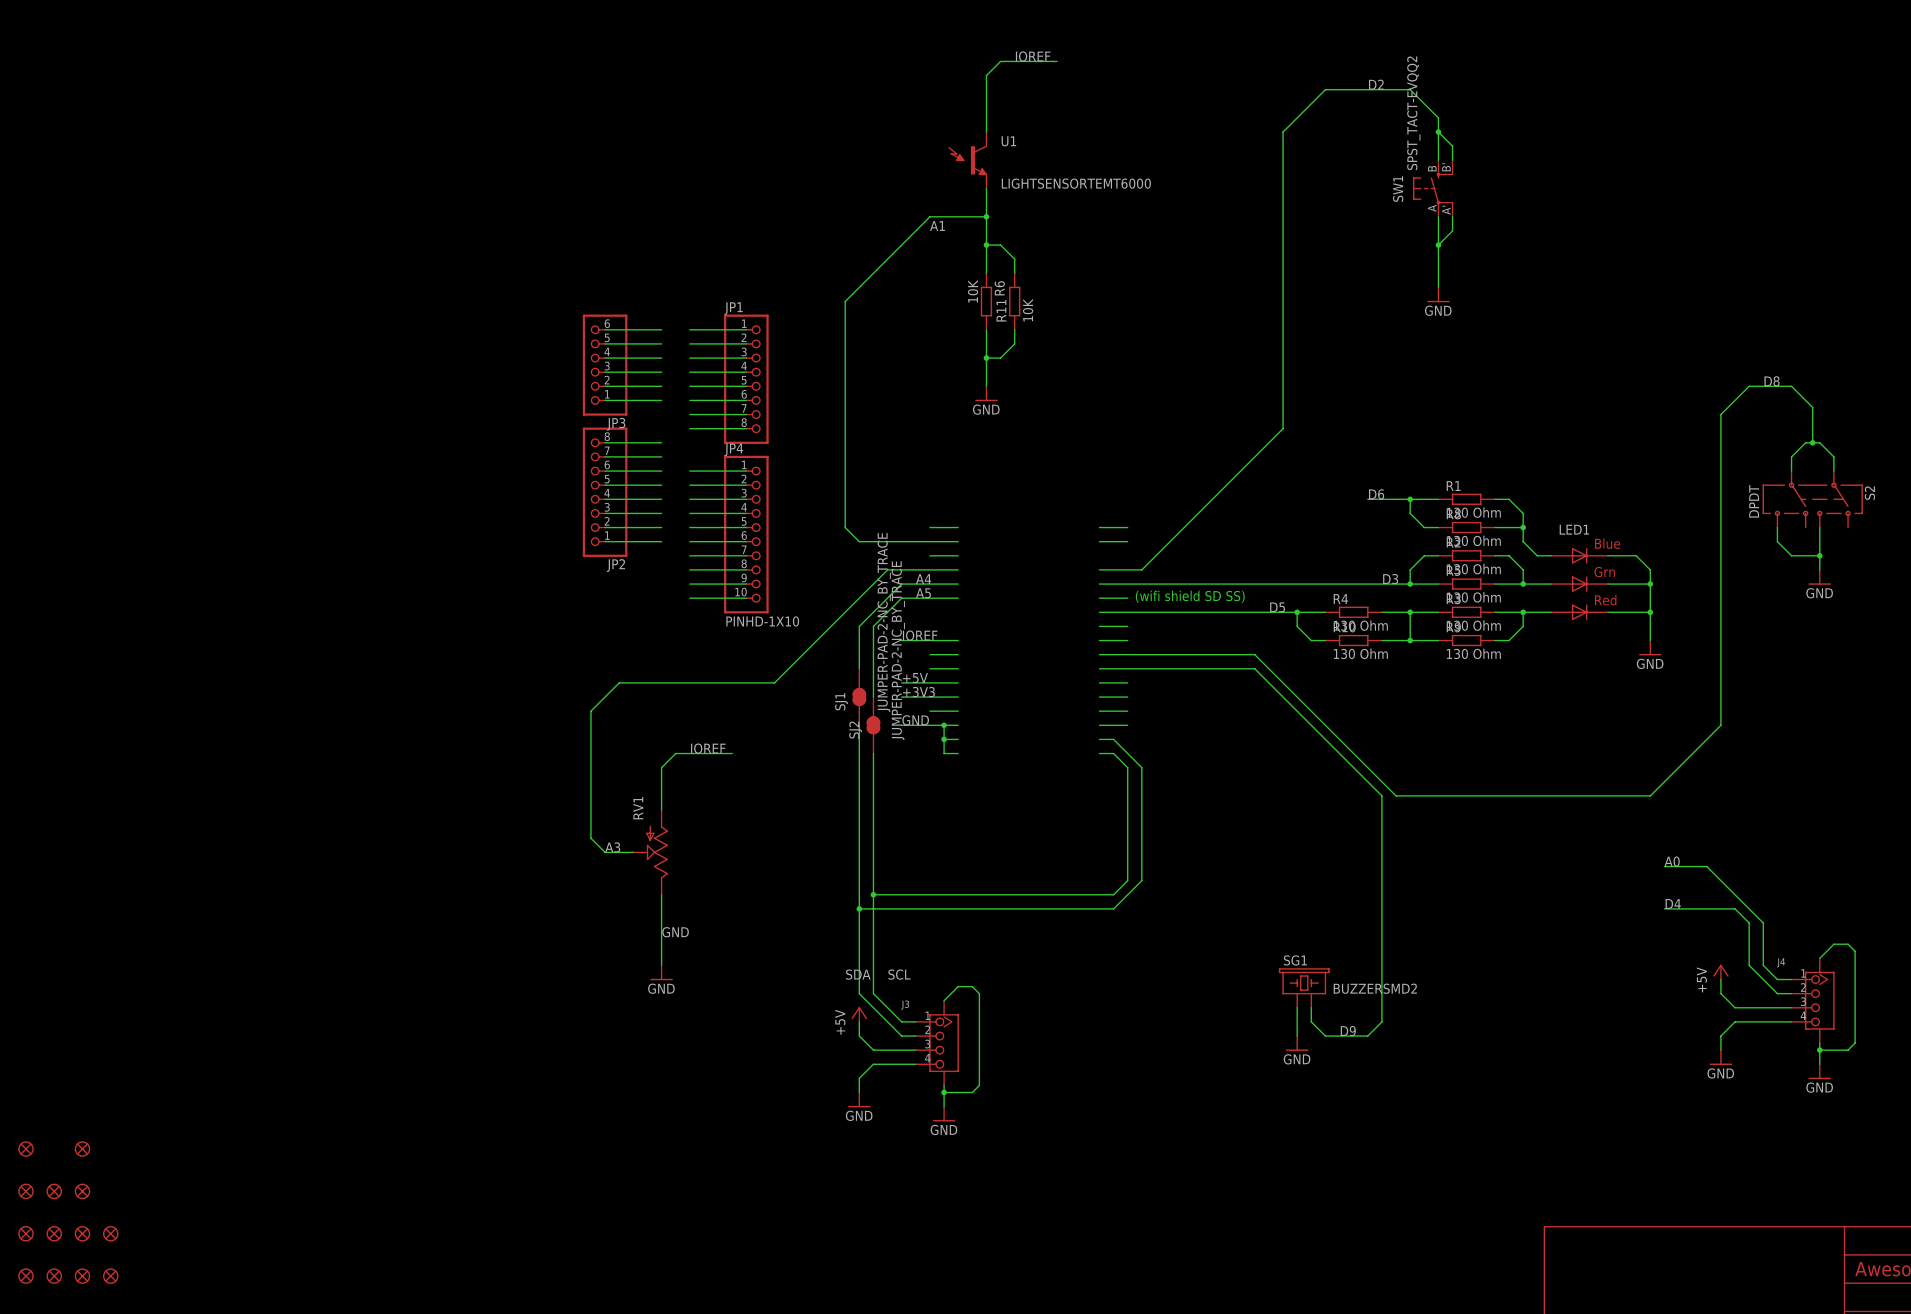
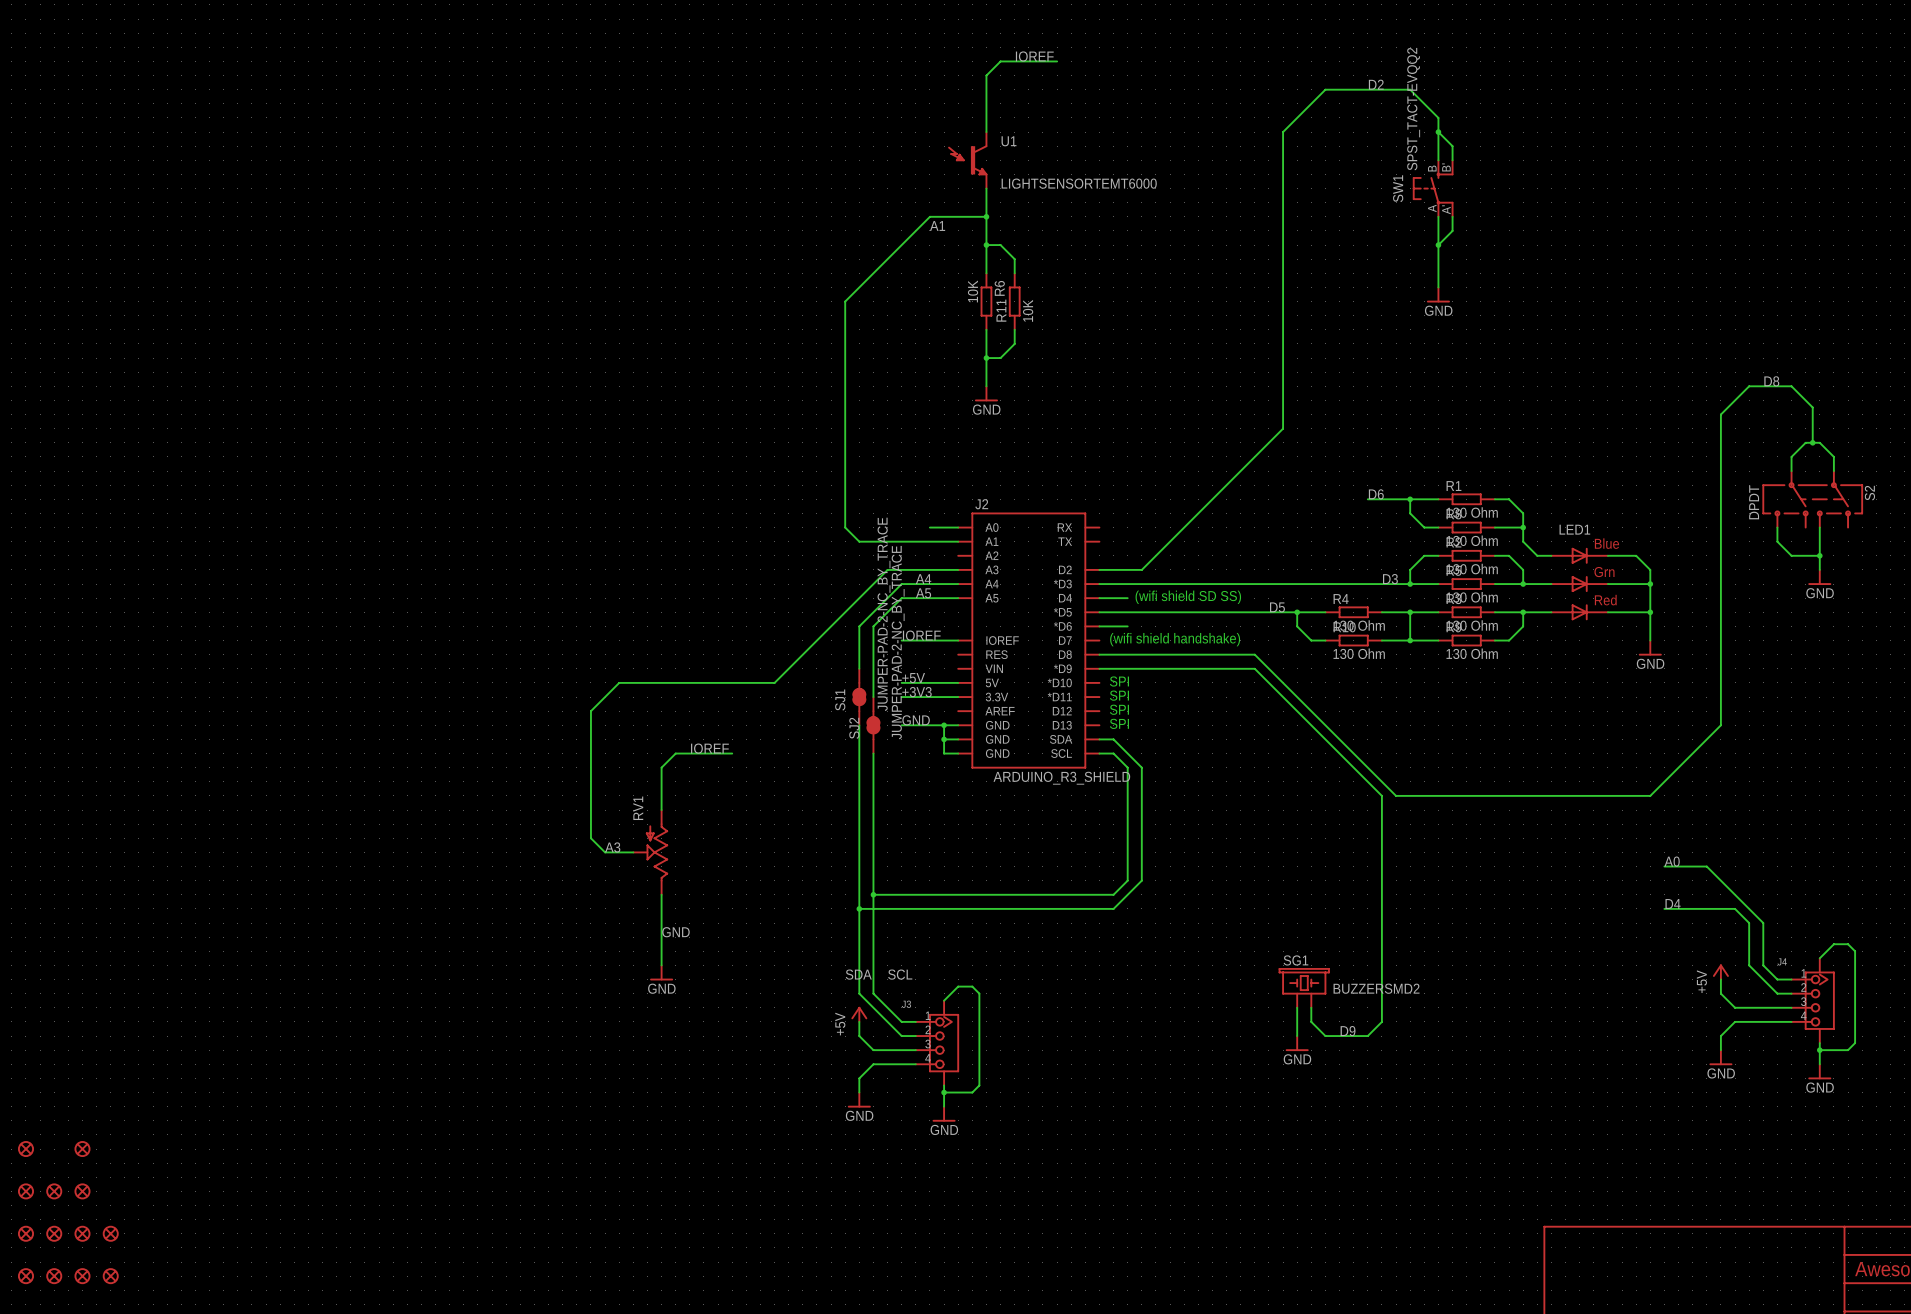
wire: (605, 329) (661, 329) -> none
wire: (689, 329) (746, 329) -> none
wire: (605, 343) (661, 343) -> none
wire: (689, 343) (746, 343) -> none
wire: (605, 358) (661, 358) -> none
wire: (689, 358) (746, 358) -> none
JP3: (605, 365) -> none
wire: (605, 372) (661, 372) -> none
wire: (689, 372) (746, 372) -> none
JP1: (746, 379) -> none
wire: (605, 386) (661, 386) -> none
wire: (689, 386) (746, 386) -> none
wire: (605, 400) (661, 400) -> none
wire: (689, 400) (746, 400) -> none
wire: (689, 414) (746, 414) -> none
wire: (689, 428) (746, 428) -> none
wire: (605, 442) (661, 442) -> none
wire: (605, 456) (661, 456) -> none
wire: (605, 471) (661, 471) -> none
wire: (689, 471) (746, 471) -> none
wire: (605, 485) (661, 485) -> none
wire: (689, 485) (746, 485) -> none
JP2: (605, 492) -> none
wire: (605, 499) (661, 499) -> none
wire: (689, 499) (746, 499) -> none
wire: (605, 513) (661, 513) -> none
wire: (689, 513) (746, 513) -> none
wire: (605, 527) (661, 527) -> none
wire: (689, 527) (746, 527) -> none
wire: (1099, 527) (1127, 527) -> none
JP4: PINHD-1X10 (746, 534) -> none
wire: (605, 541) (661, 541) -> none
wire: (689, 541) (746, 541) -> none
wire: (1099, 541) (1127, 541) -> none
wire: (689, 555) (746, 555) -> none
wire: (929, 555) (958, 555) -> none
wire: (689, 569) (746, 569) -> none
wire: (689, 584) (746, 584) -> none
wire: (689, 598) (746, 598) -> none
text: none -> (wifi shield handshake) (1175, 639)
J2: none -> ARDUINO_R3_SHIELD (1028, 640)
wire: (1099, 640) (1127, 640) -> none
wire: (929, 654) (958, 654) -> none
wire: (929, 668) (958, 668) -> none
text: none -> SPI (1119, 681)
wire: (1099, 682) (1127, 682) -> none
text: none -> SPI (1119, 695)
wire: (1099, 697) (1127, 697) -> none
text: none -> SPI (1119, 709)
wire: (929, 711) (958, 711) -> none
wire: (1099, 711) (1127, 711) -> none
text: none -> SPI (1119, 723)
wire: (1099, 725) (1127, 725) -> none

